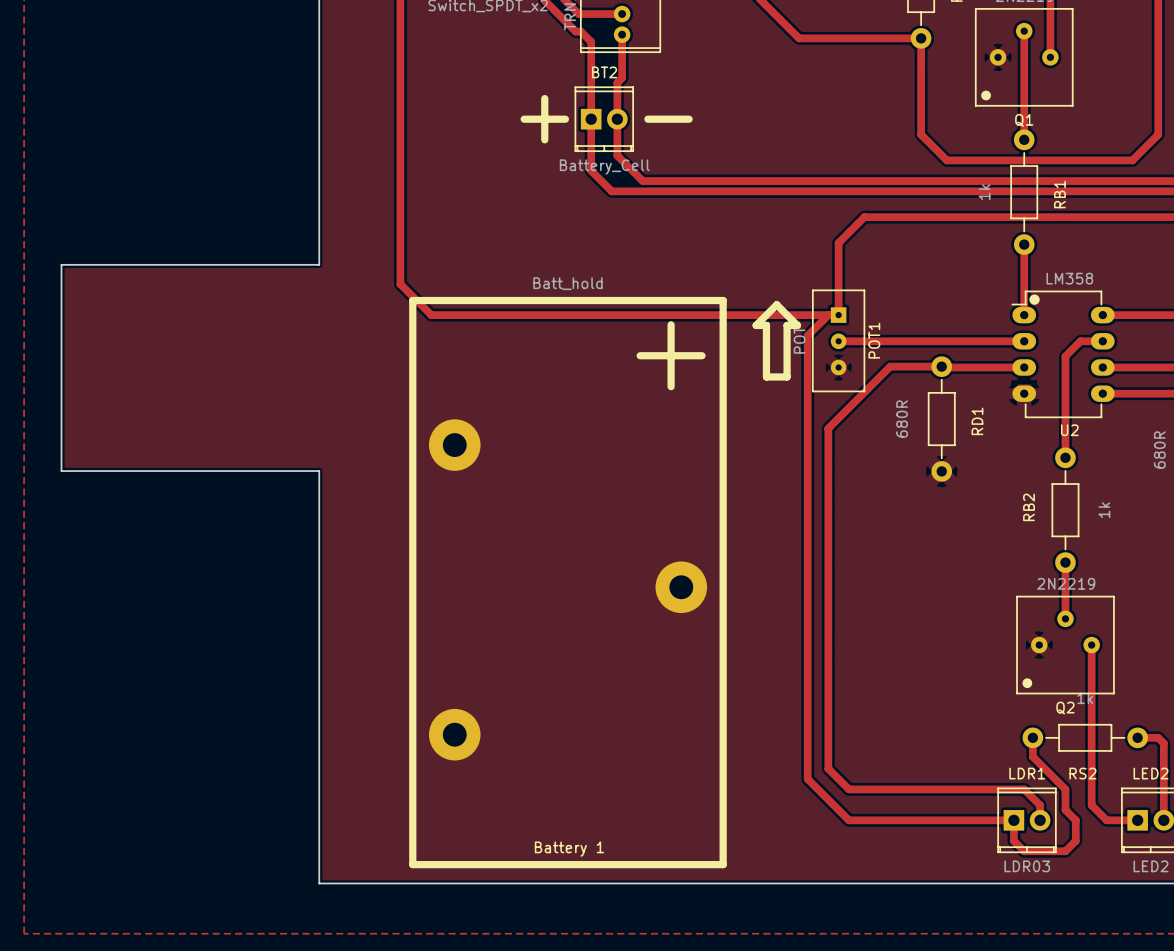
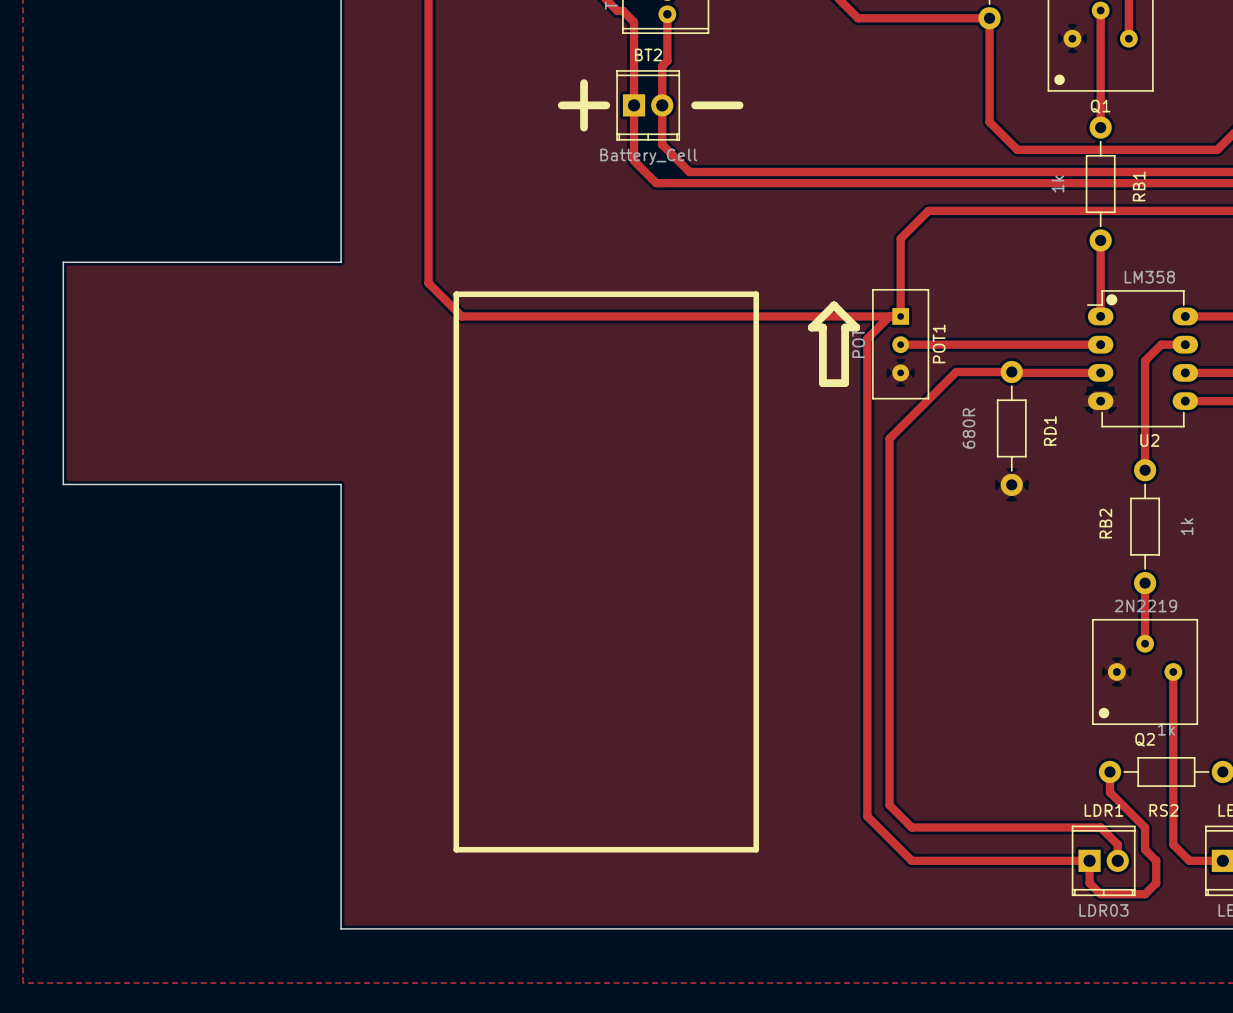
line: none -> (456, 294) (756, 294) (756, 849) (456, 849) (456, 294)
Battery 1: Batt_hold (567, 582) -> none

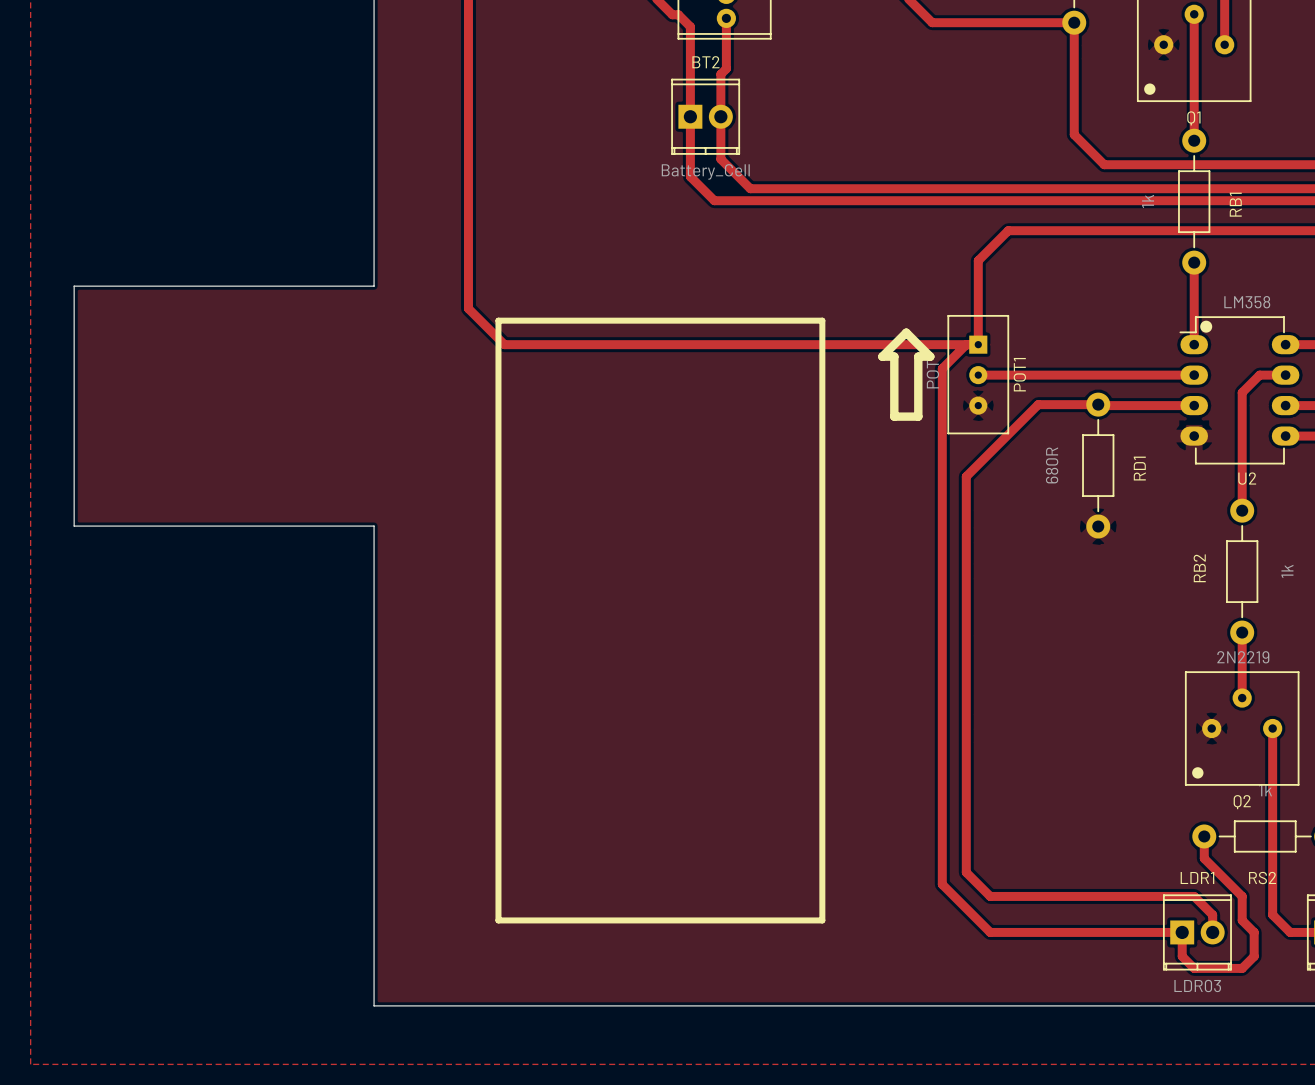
line: (584, 83) (584, 127) -> none
line: (561, 105) (606, 105) -> none
line: (695, 105) (739, 105) -> none

